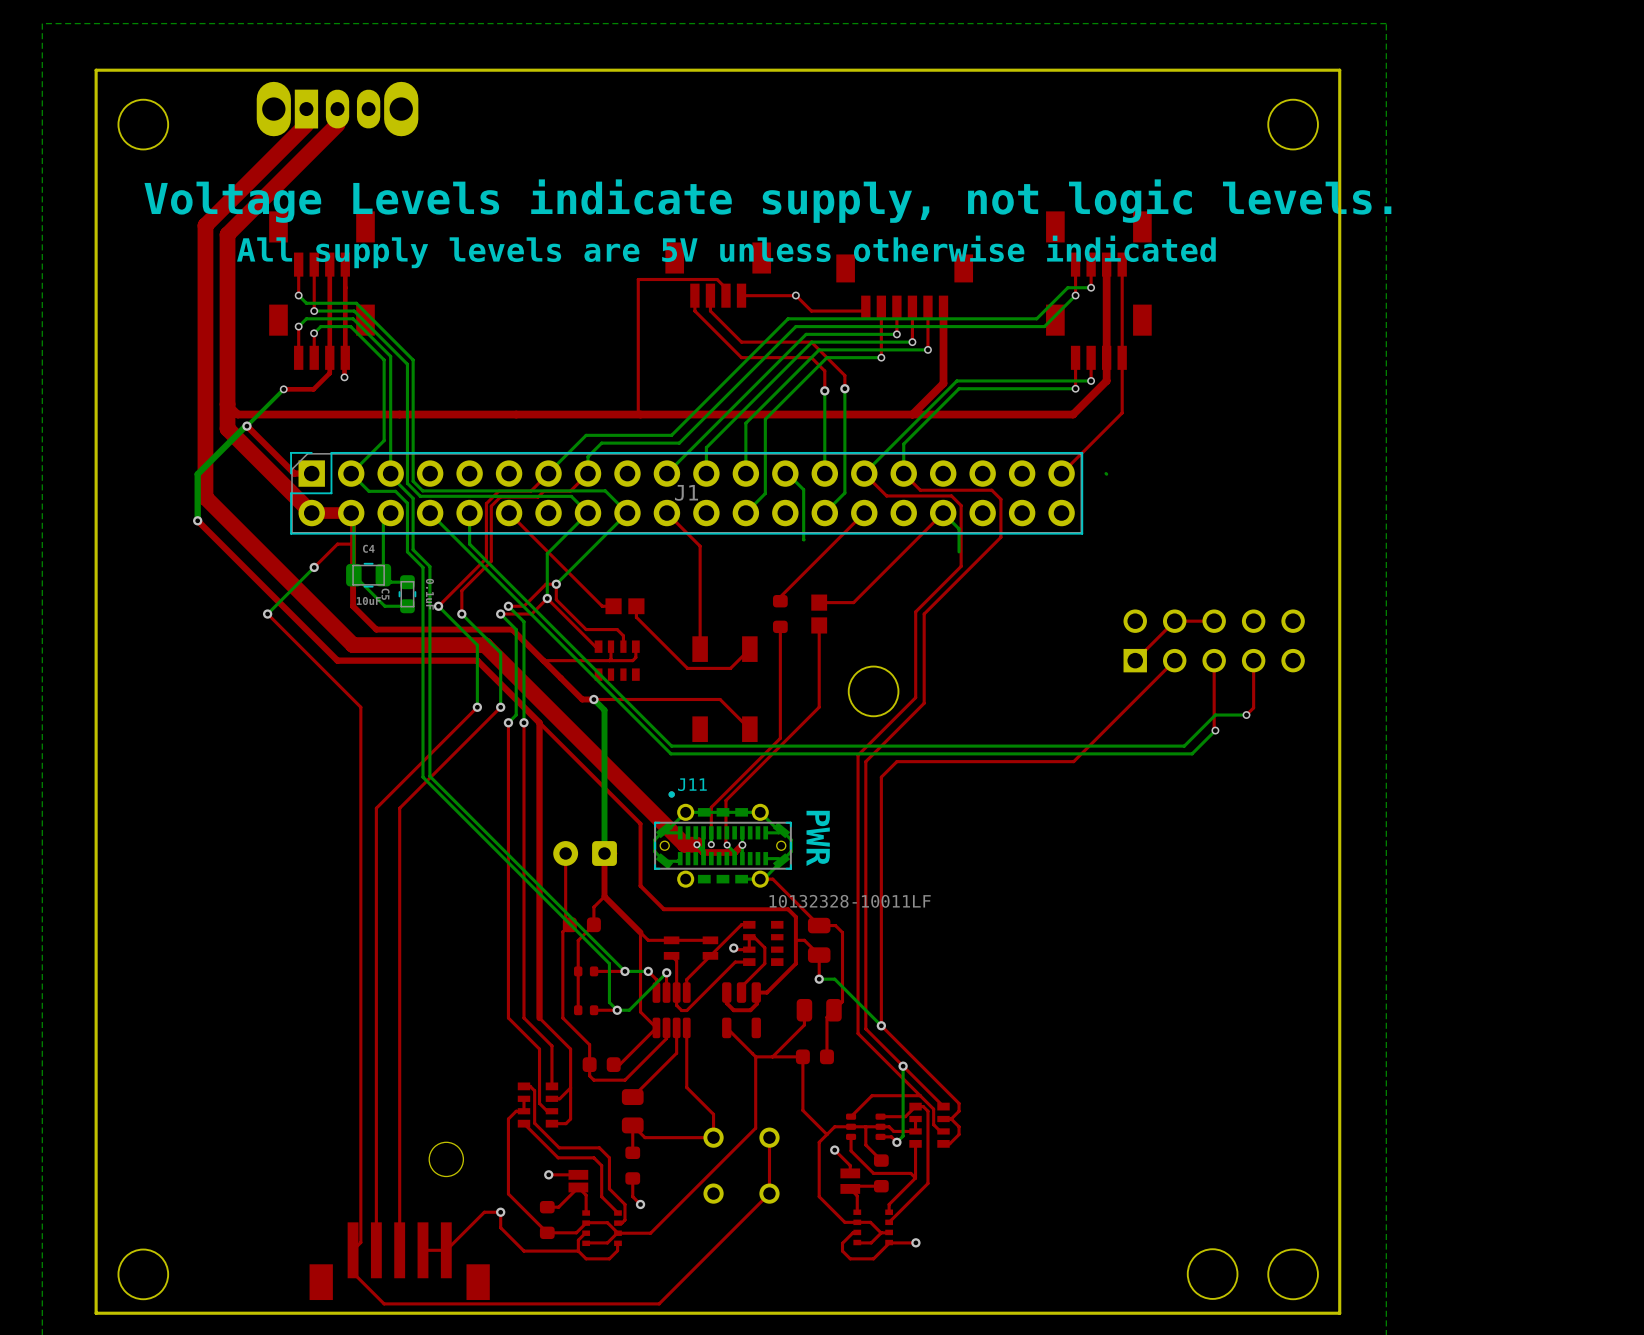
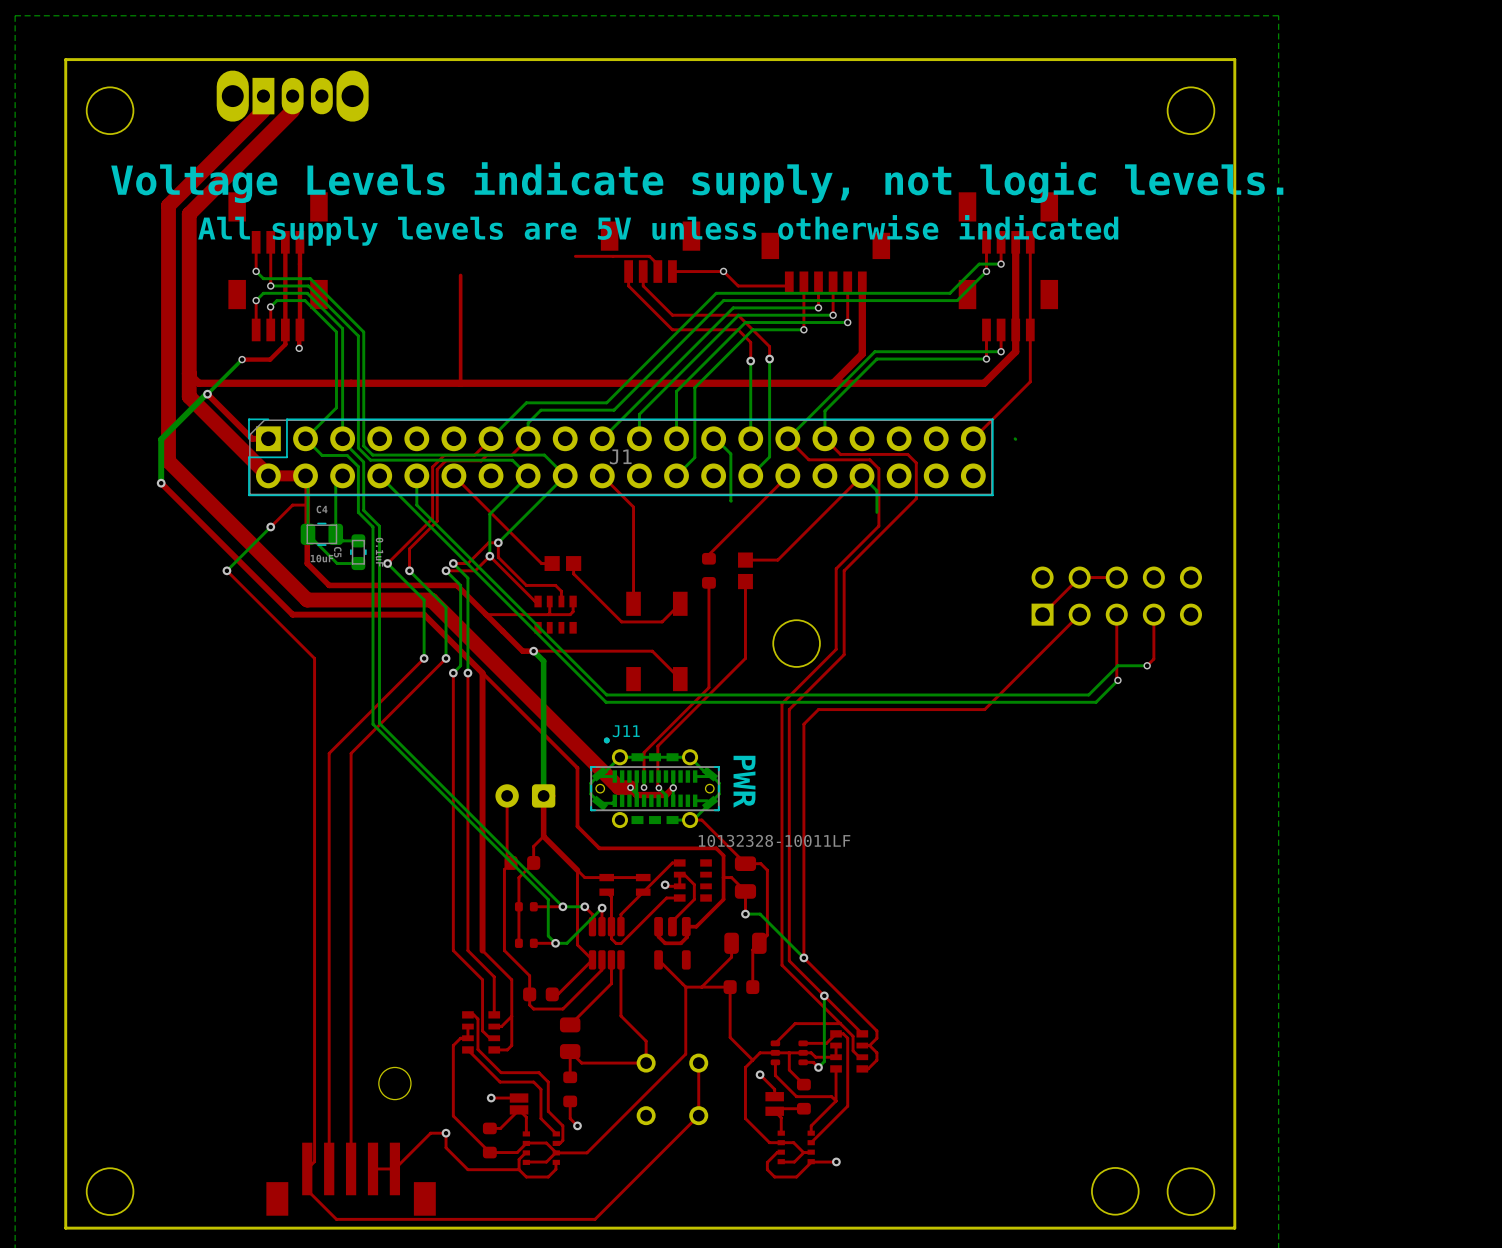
top track: (638, 279) (638, 412) (640, 414) -> none
top track: none -> (460, 275) (460, 383)

